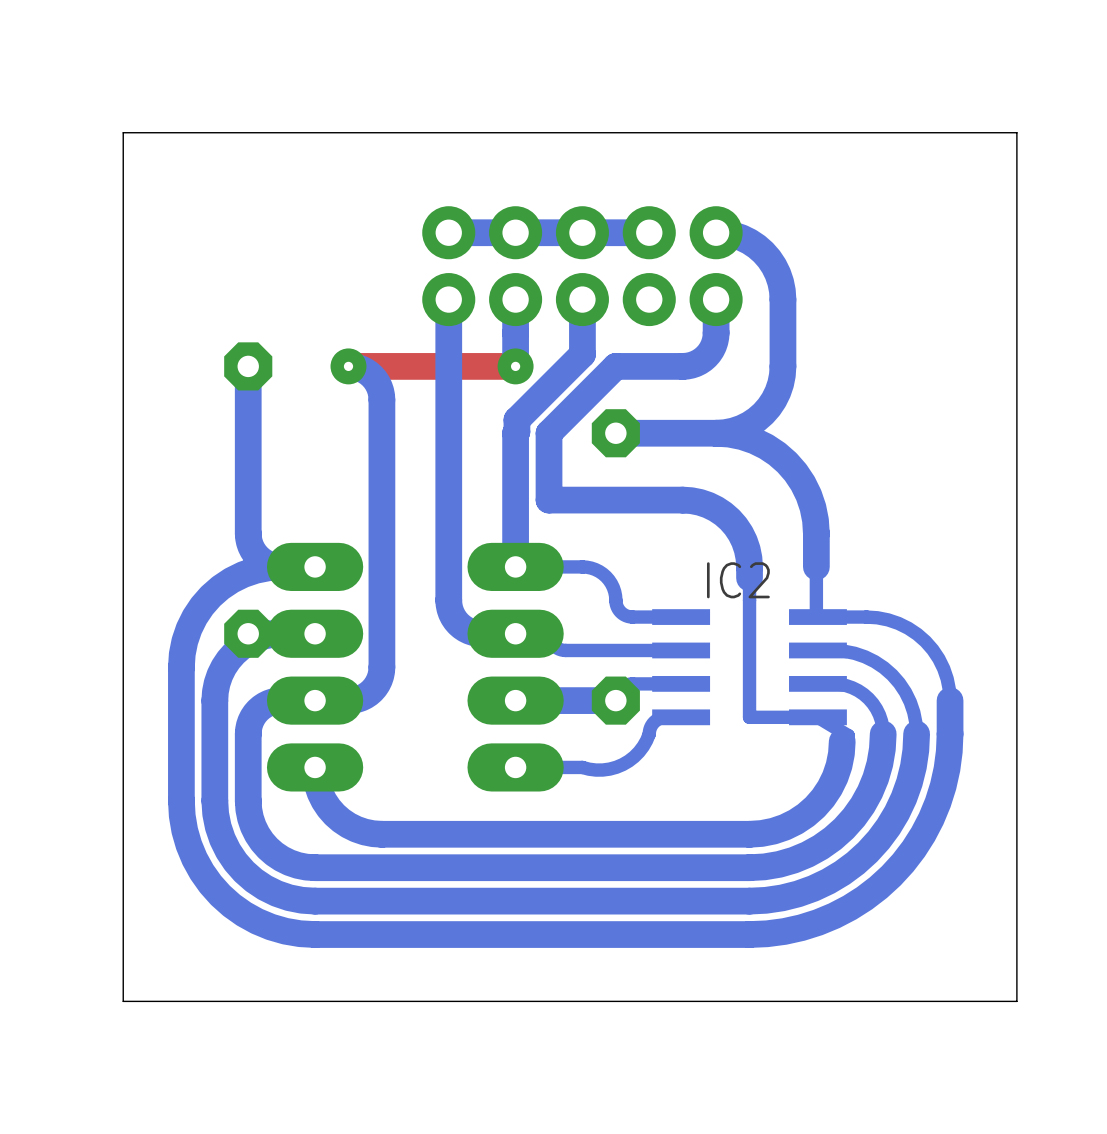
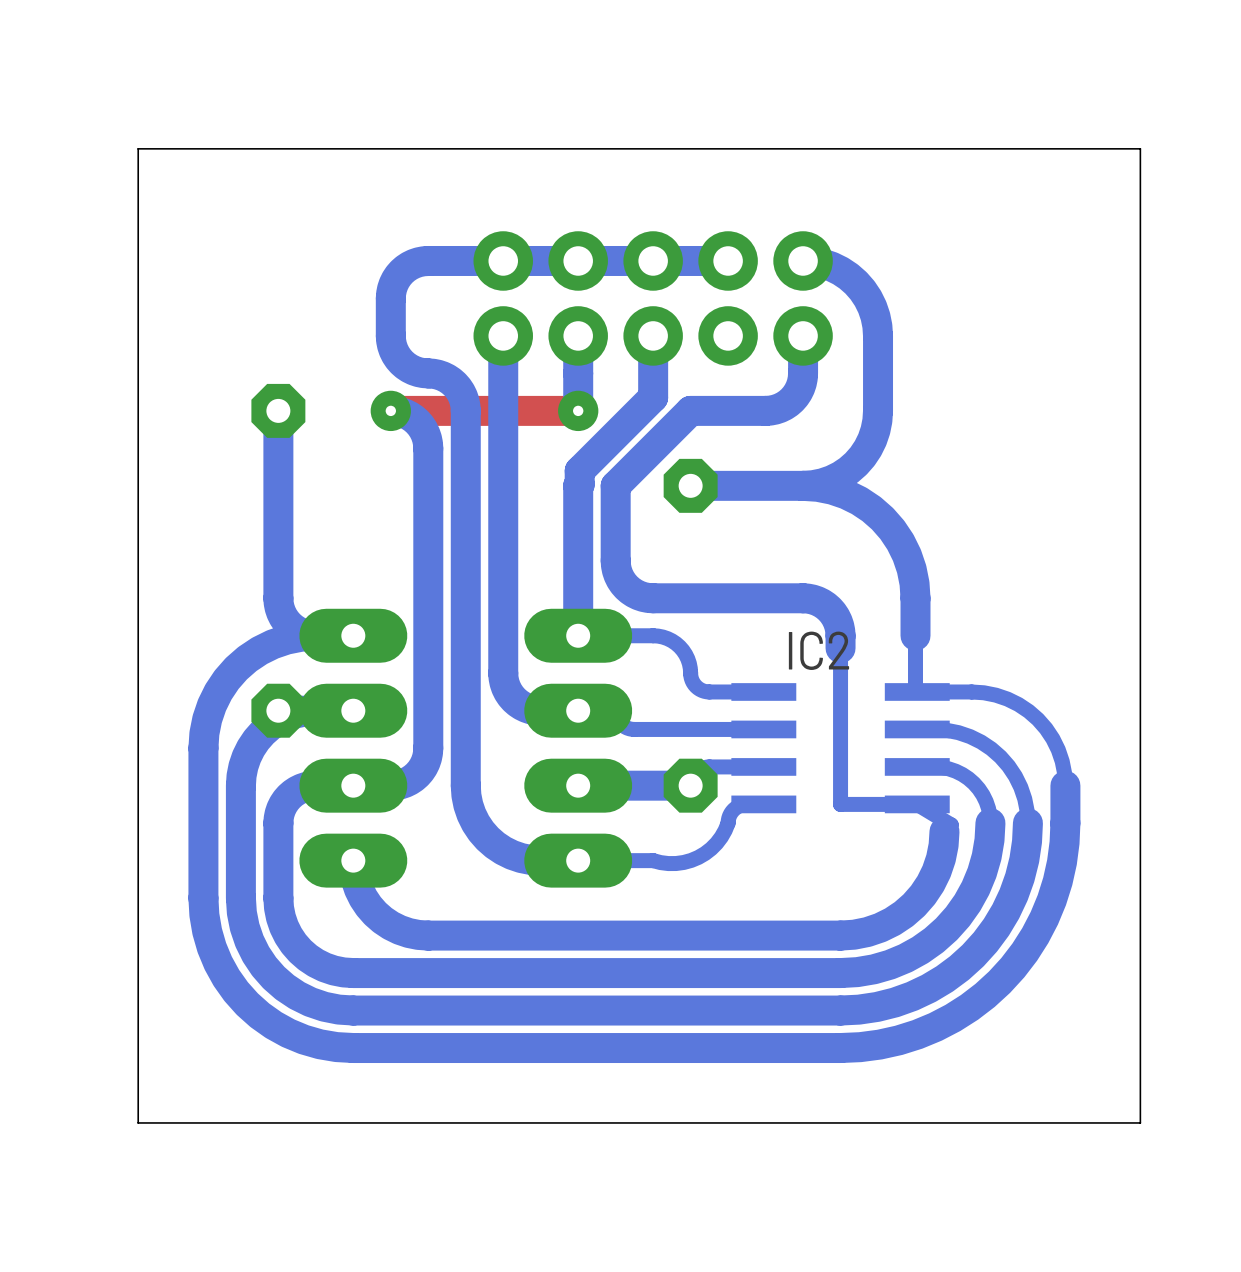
bottom track: none -> (503, 260) (423, 261) (405, 268) (398, 275) (392, 288) (391, 340) (395, 354) (405, 365) (418, 372) (437, 374) (451, 381) (460, 392) (465, 406) (465, 785) (471, 814) (487, 838) (512, 854) (530, 859) (578, 860)
bottom track: (549, 500) (682, 500) (699, 502) (723, 513) (735, 526) (747, 549) (749, 566) -> (615, 560) (618, 575) (626, 587) (638, 595) (648, 597) (812, 599) (825, 606) (832, 612) (837, 621) (840, 635)

